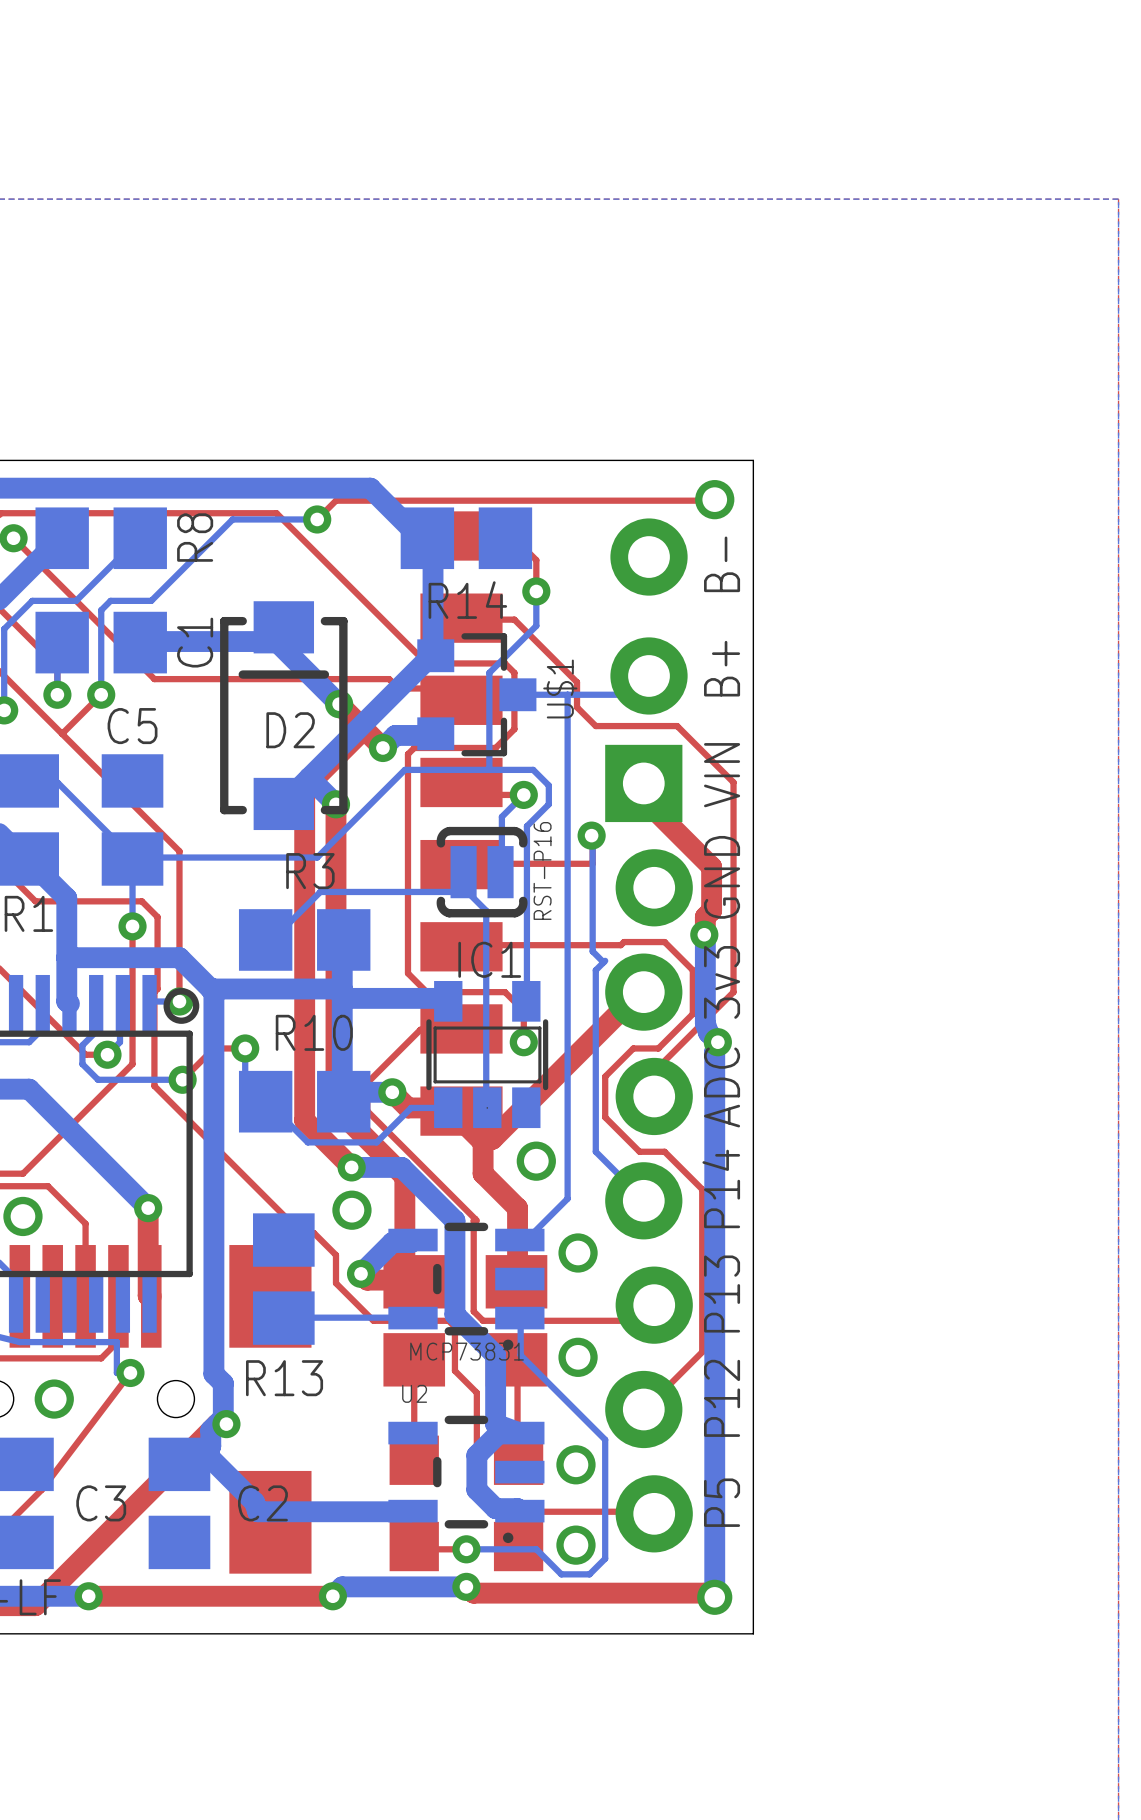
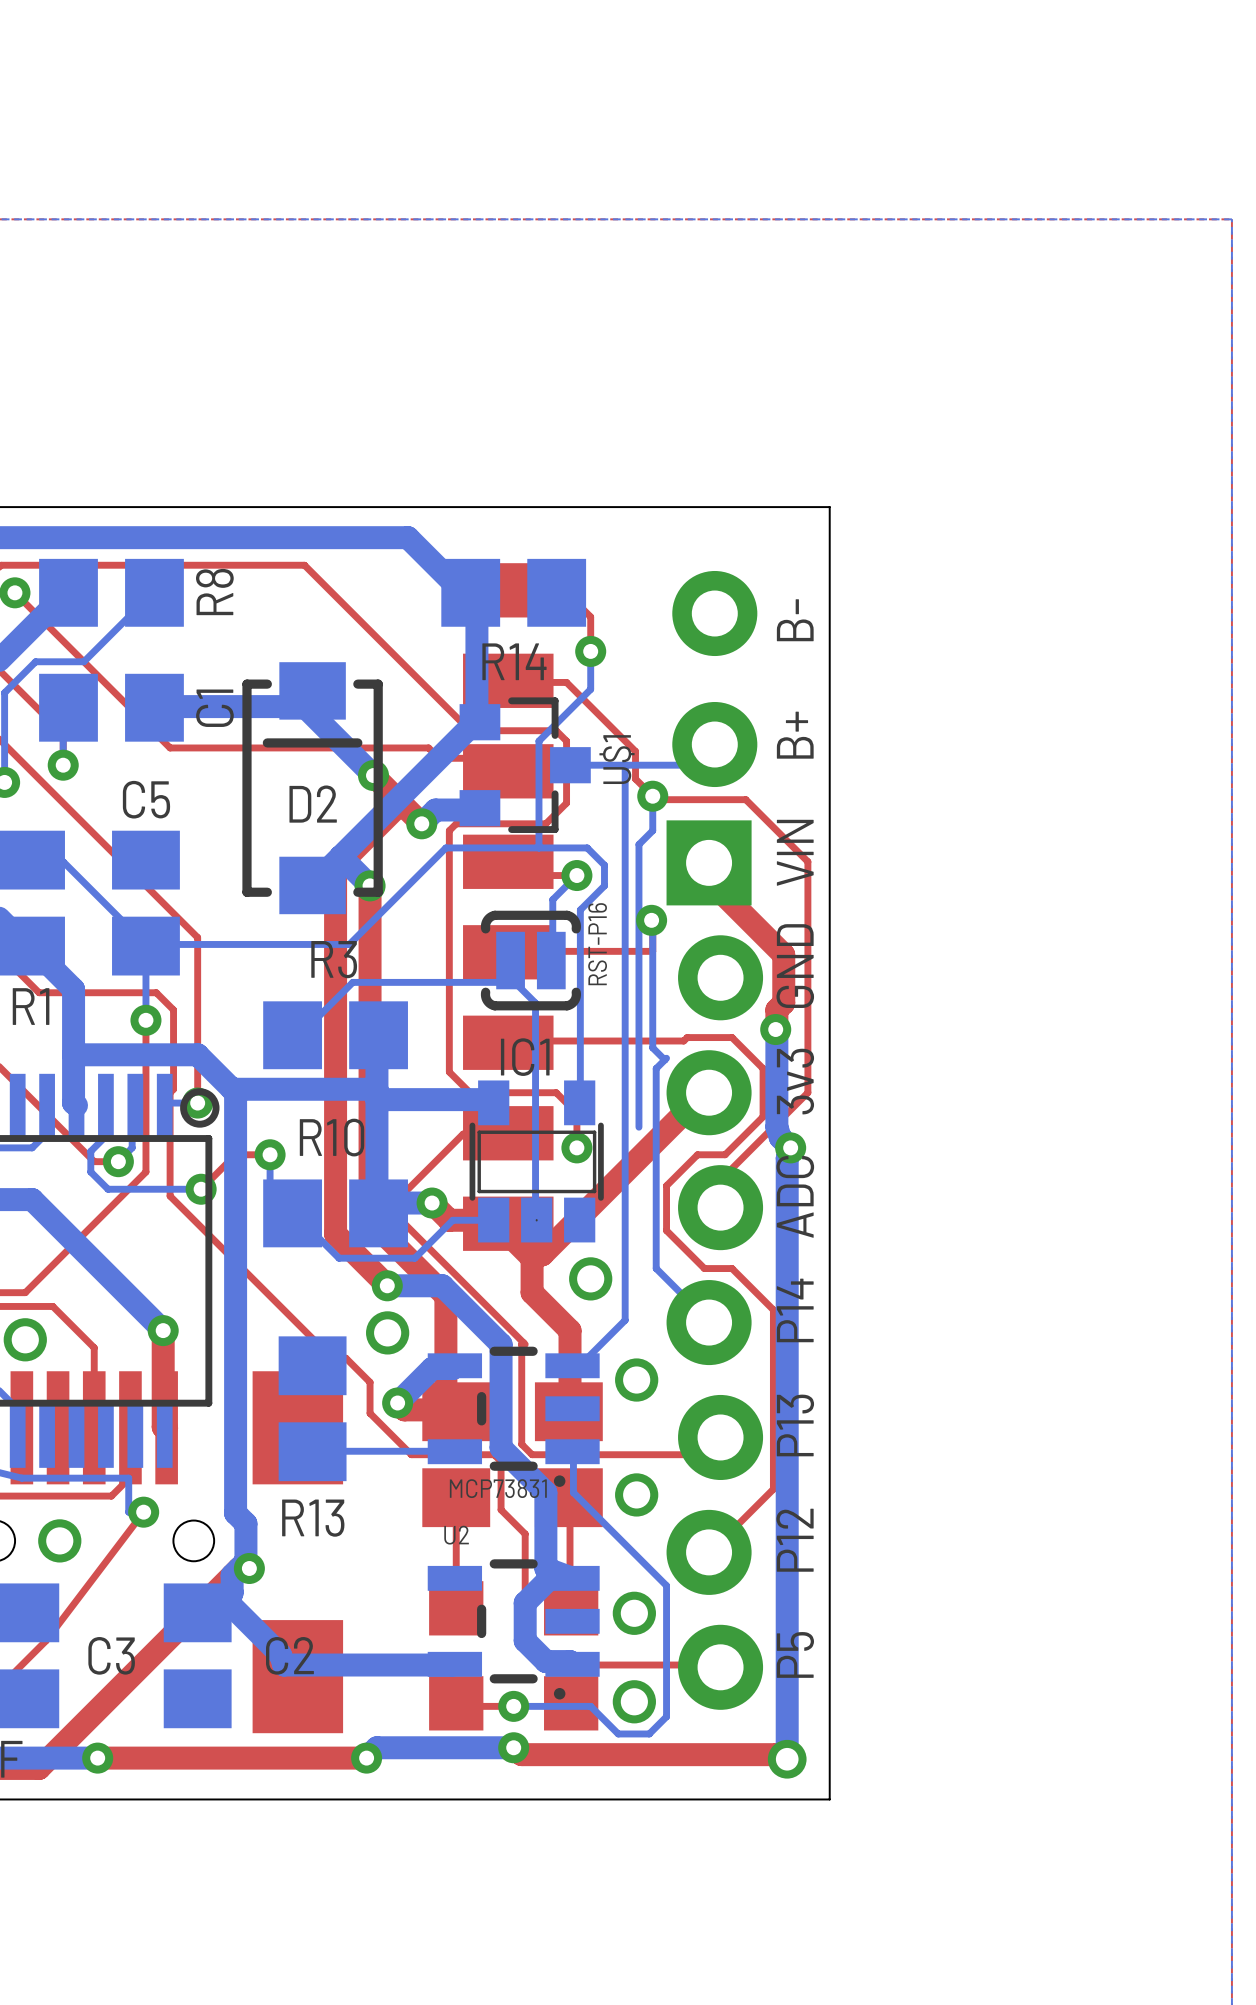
top track: (714, 499) (335, 500) (317, 519) -> none
via: (714, 499) -> none
bottom track: (317, 519) (232, 519) (151, 600) (110, 600) (101, 610) (101, 694) -> none
via: (317, 519) -> none
top track: (101, 694) (62, 733) -> none
via: (101, 694) -> none
bottom track: none -> (652, 796) (652, 830) (638, 844) (638, 1127)
via: none -> (652, 796)

